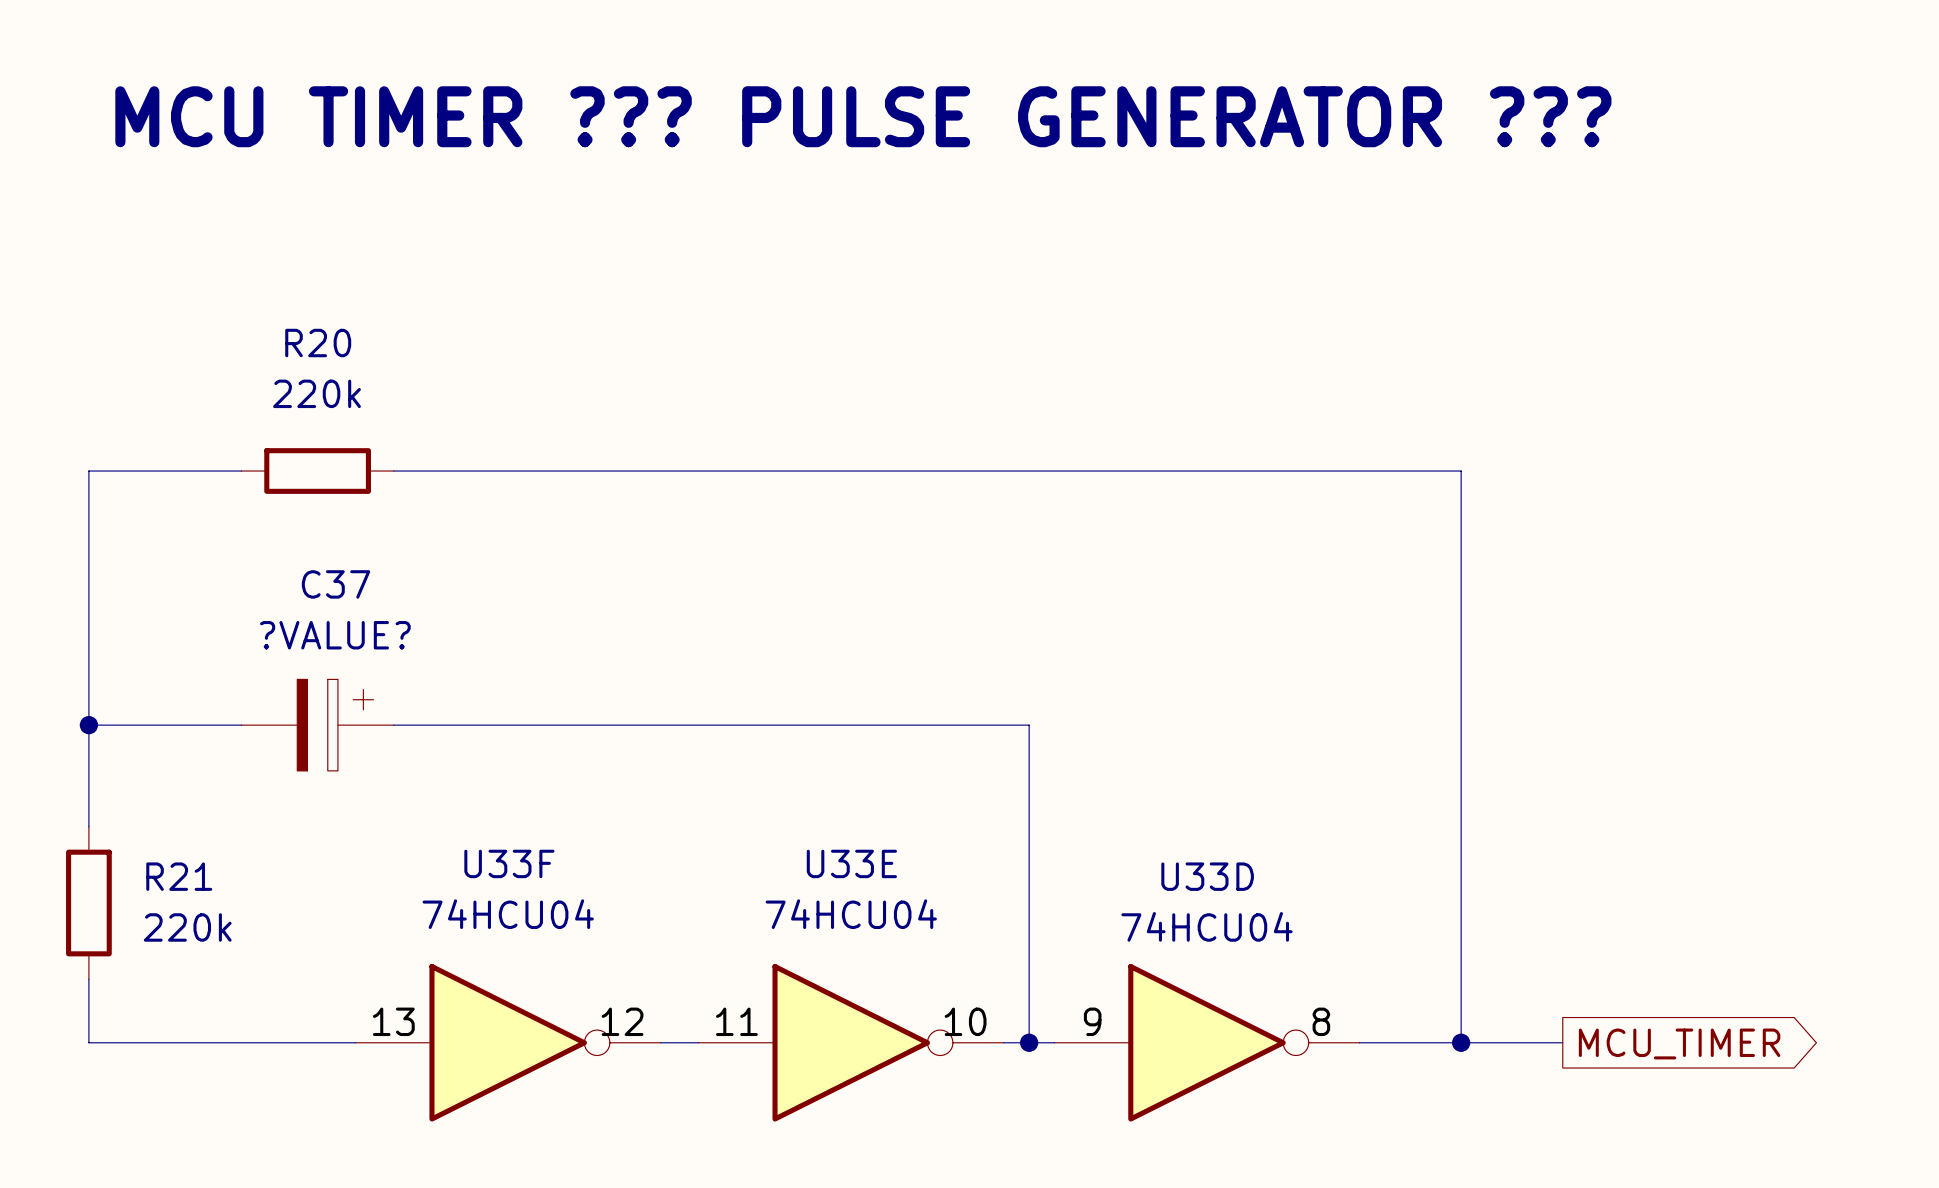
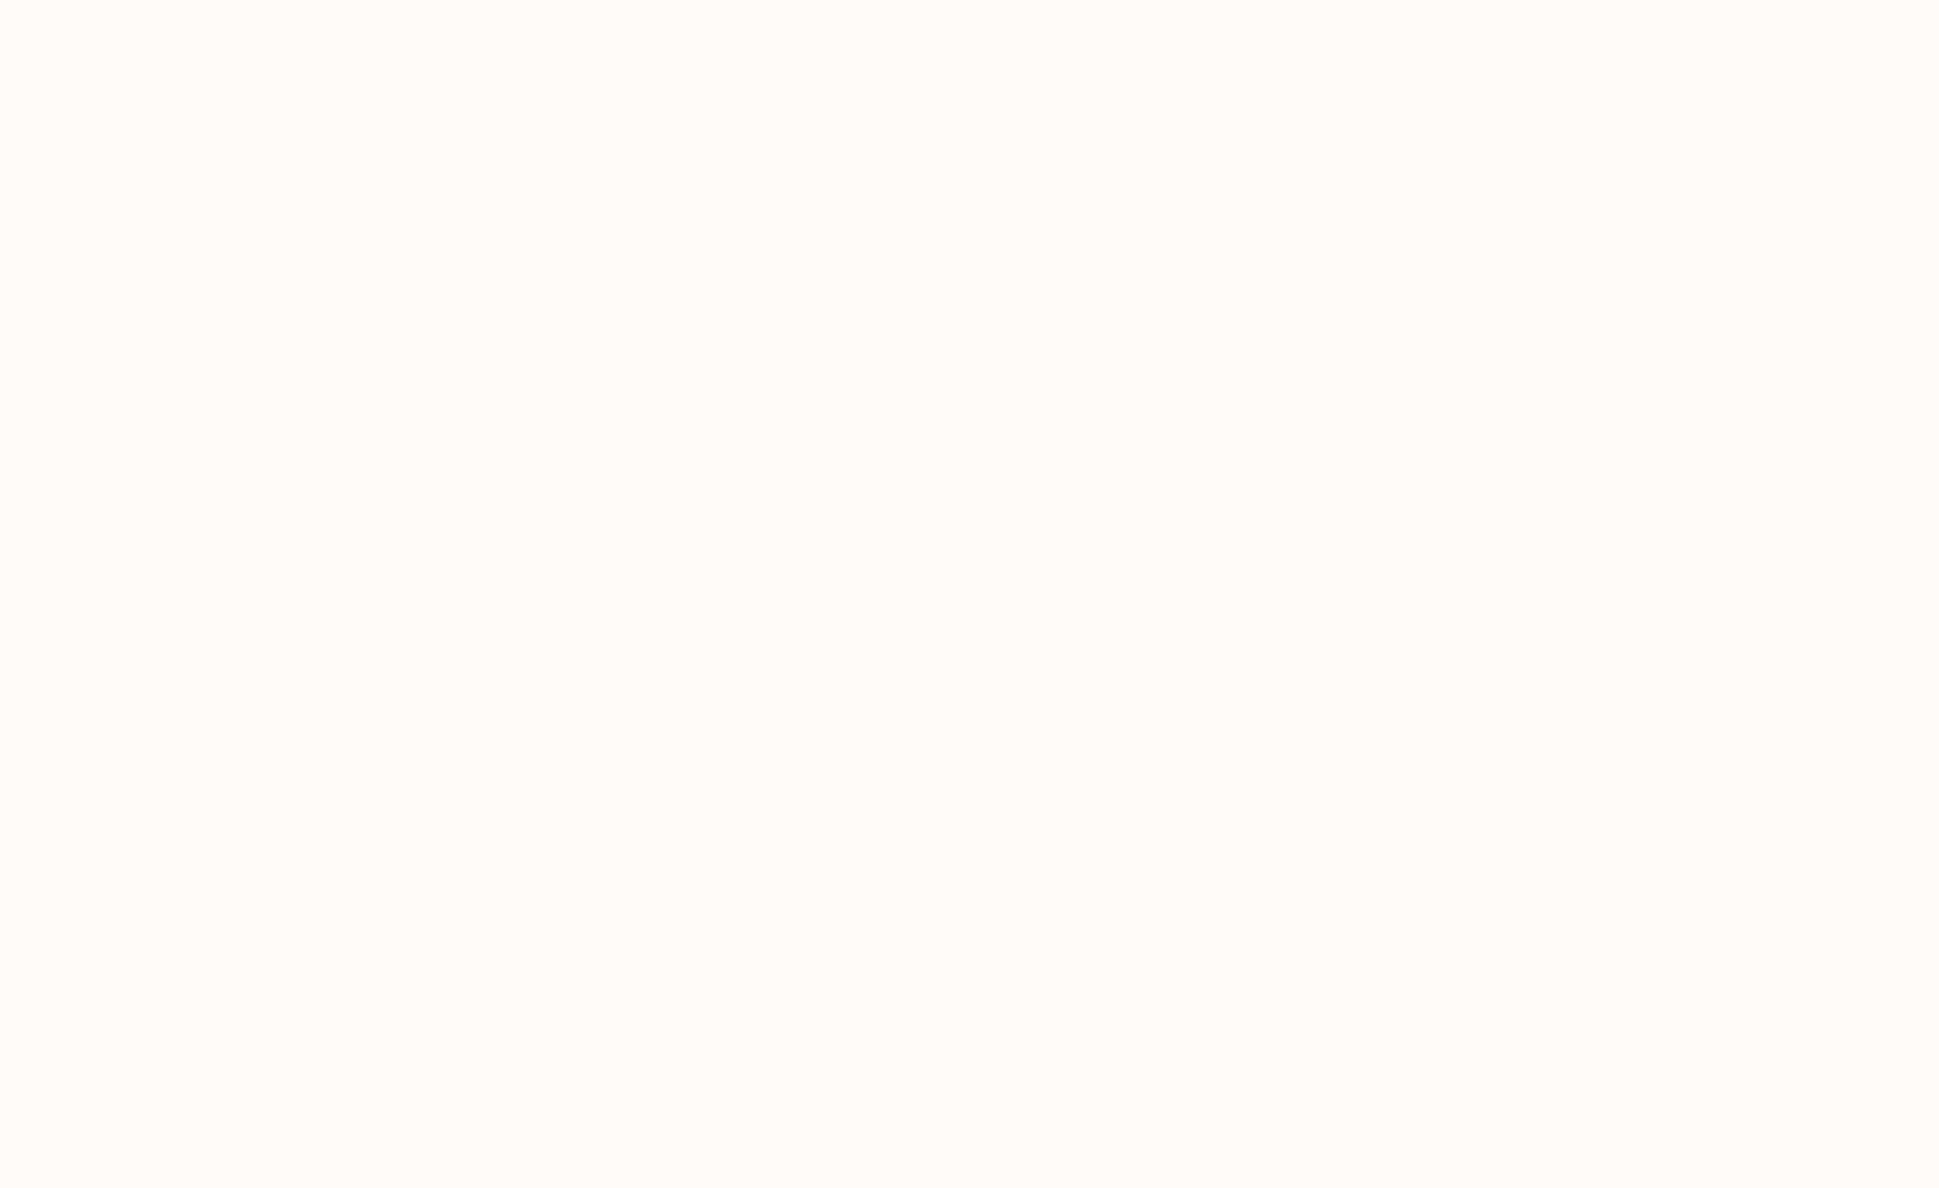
text: MCU TIMER ??? PULSE GENERATOR ??? (863, 116) -> none
wire: (241, 471) (88, 471) (88, 826) -> none
R20: 220k (317, 471) -> none
wire: (393, 471) (1461, 471) (1461, 1042) -> none
wire: (88, 725) (241, 725) -> none
junction: (88, 725) -> none
C37: ?VALUE? (317, 725) -> none
wire: (393, 725) (1029, 725) (1029, 1042) -> none
R21: 220k (88, 903) -> none
wire: (88, 979) (88, 1042) (355, 1042) -> none
U33F: 74HCU04 (508, 1042) -> none
wire: (660, 1042) (698, 1042) -> none
U33E: 74HCU04 (851, 1042) -> none
wire: (1003, 1042) (1054, 1042) -> none
junction: (1029, 1042) -> none
U33D: 74HCU04 (1207, 1042) -> none
wire: (1359, 1042) (1562, 1042) -> none
junction: (1461, 1042) -> none
global label: MCU_TIMER (1679, 1043) -> none

